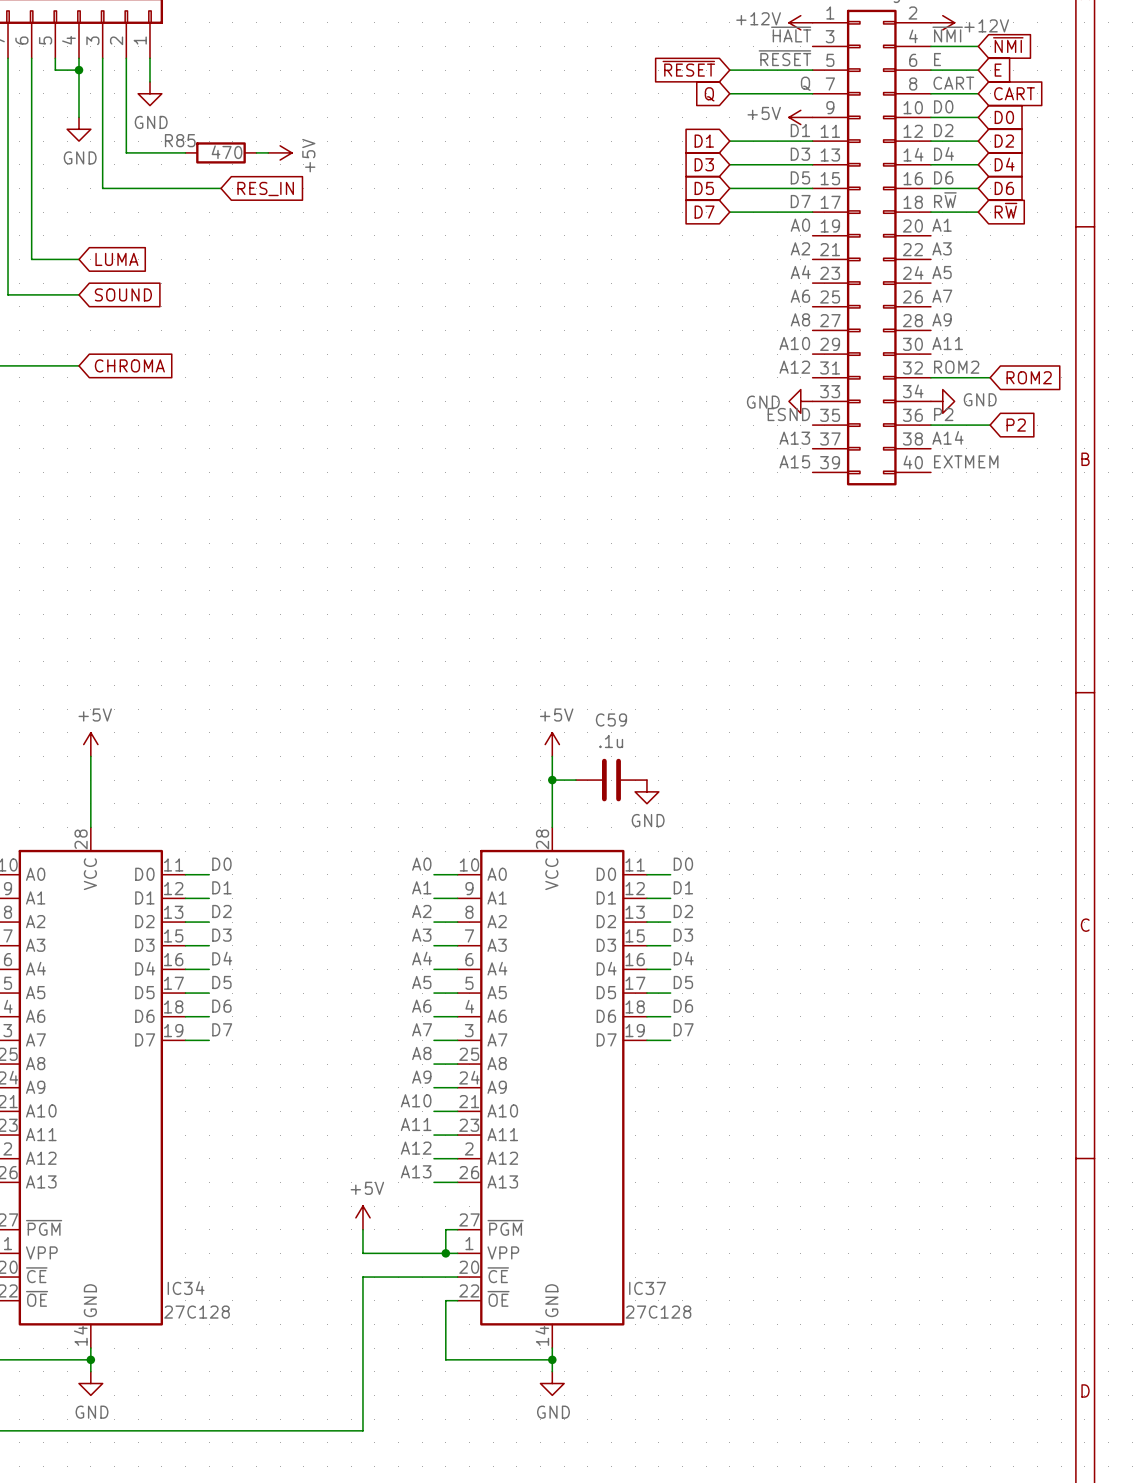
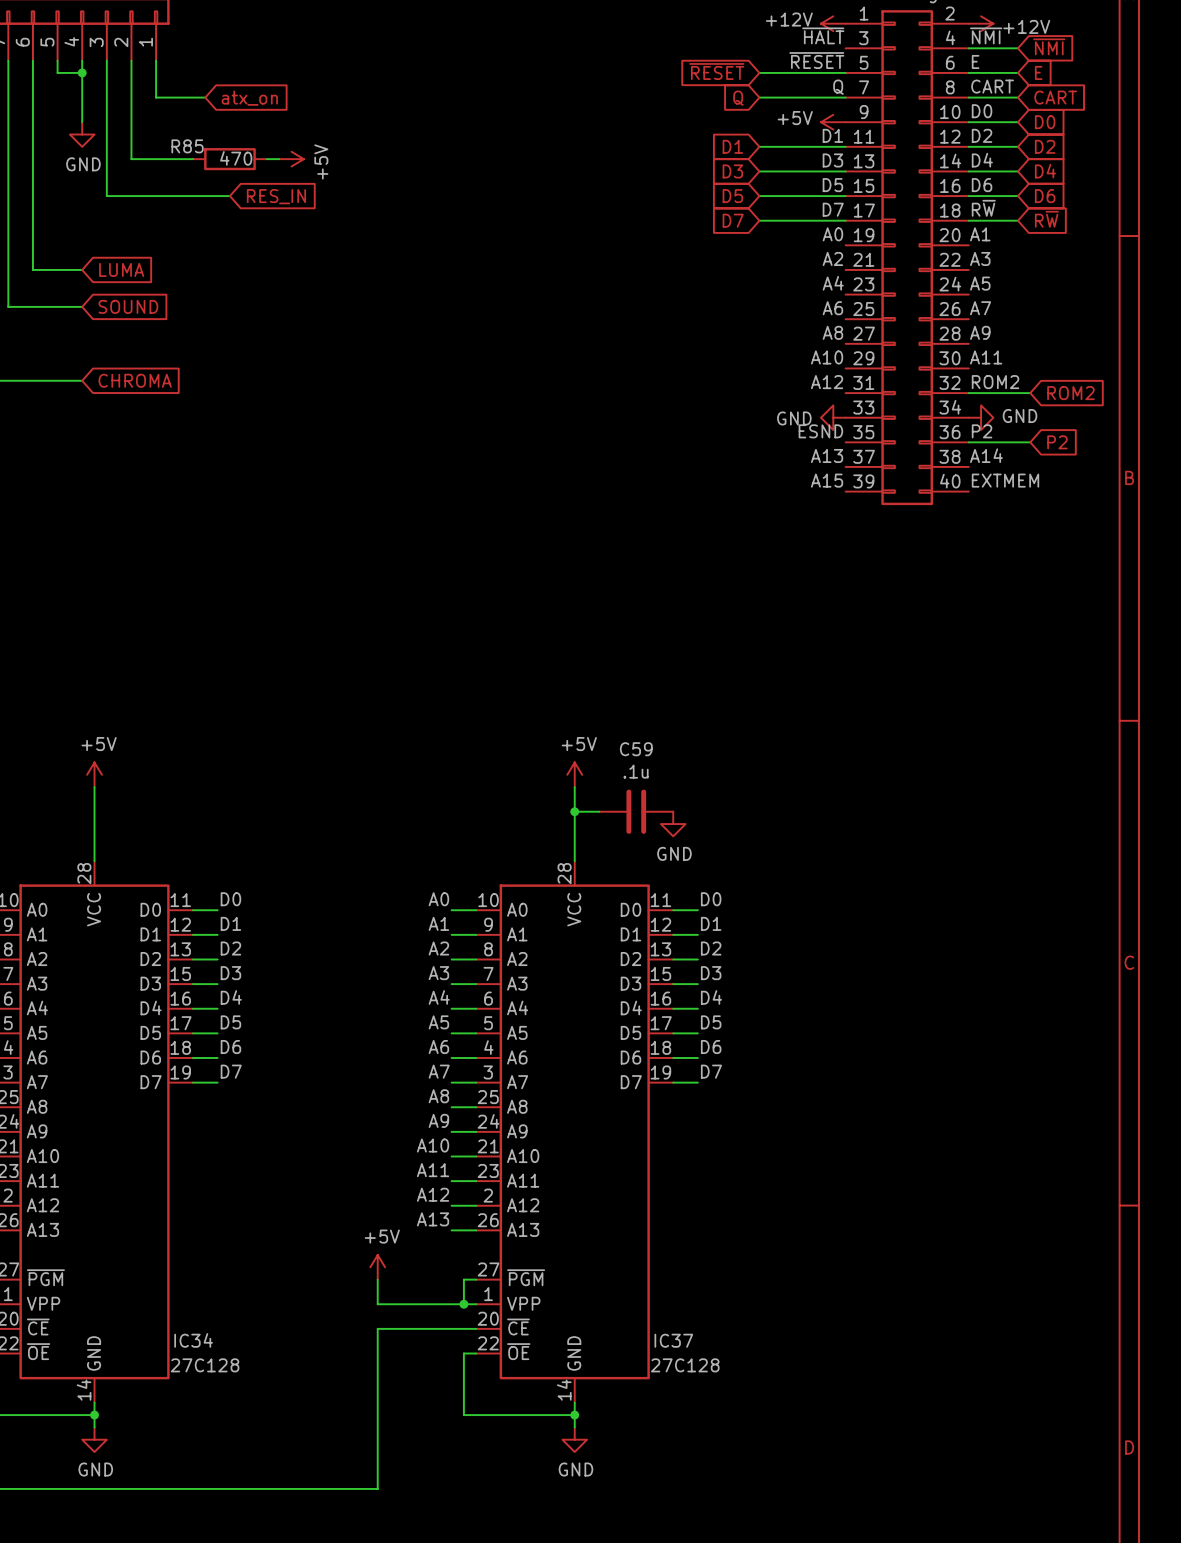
wire: none -> (156, 85) (156, 97) (205, 97)
power symbol: GND (149, 93) -> none
global label: none -> atx_on (249, 98)

